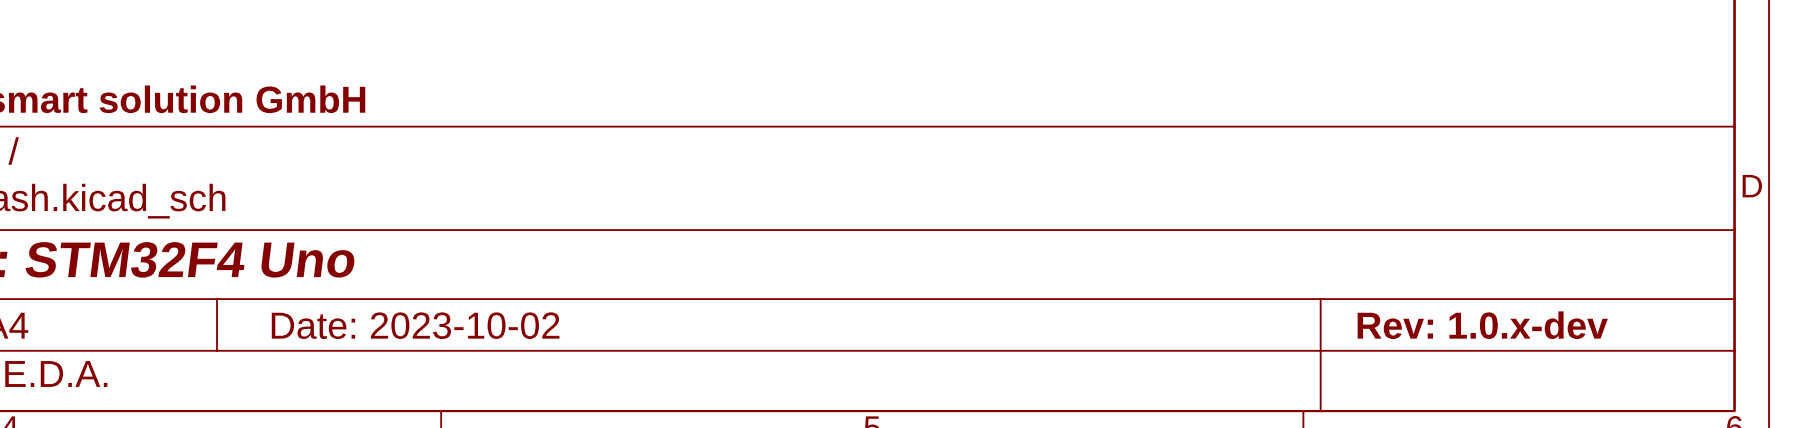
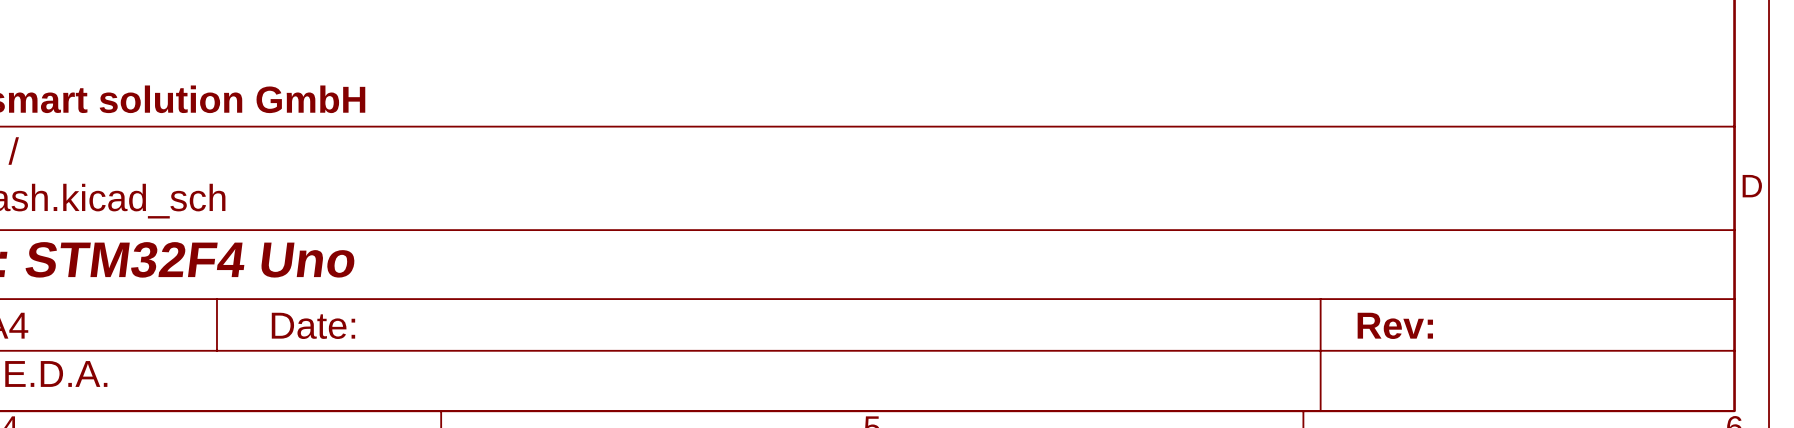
title block: Date: 2023-10-02 (415, 325) -> Date: (313, 325)
title block: Rev: 1.0.x-dev (1482, 325) -> Rev: (1395, 325)

